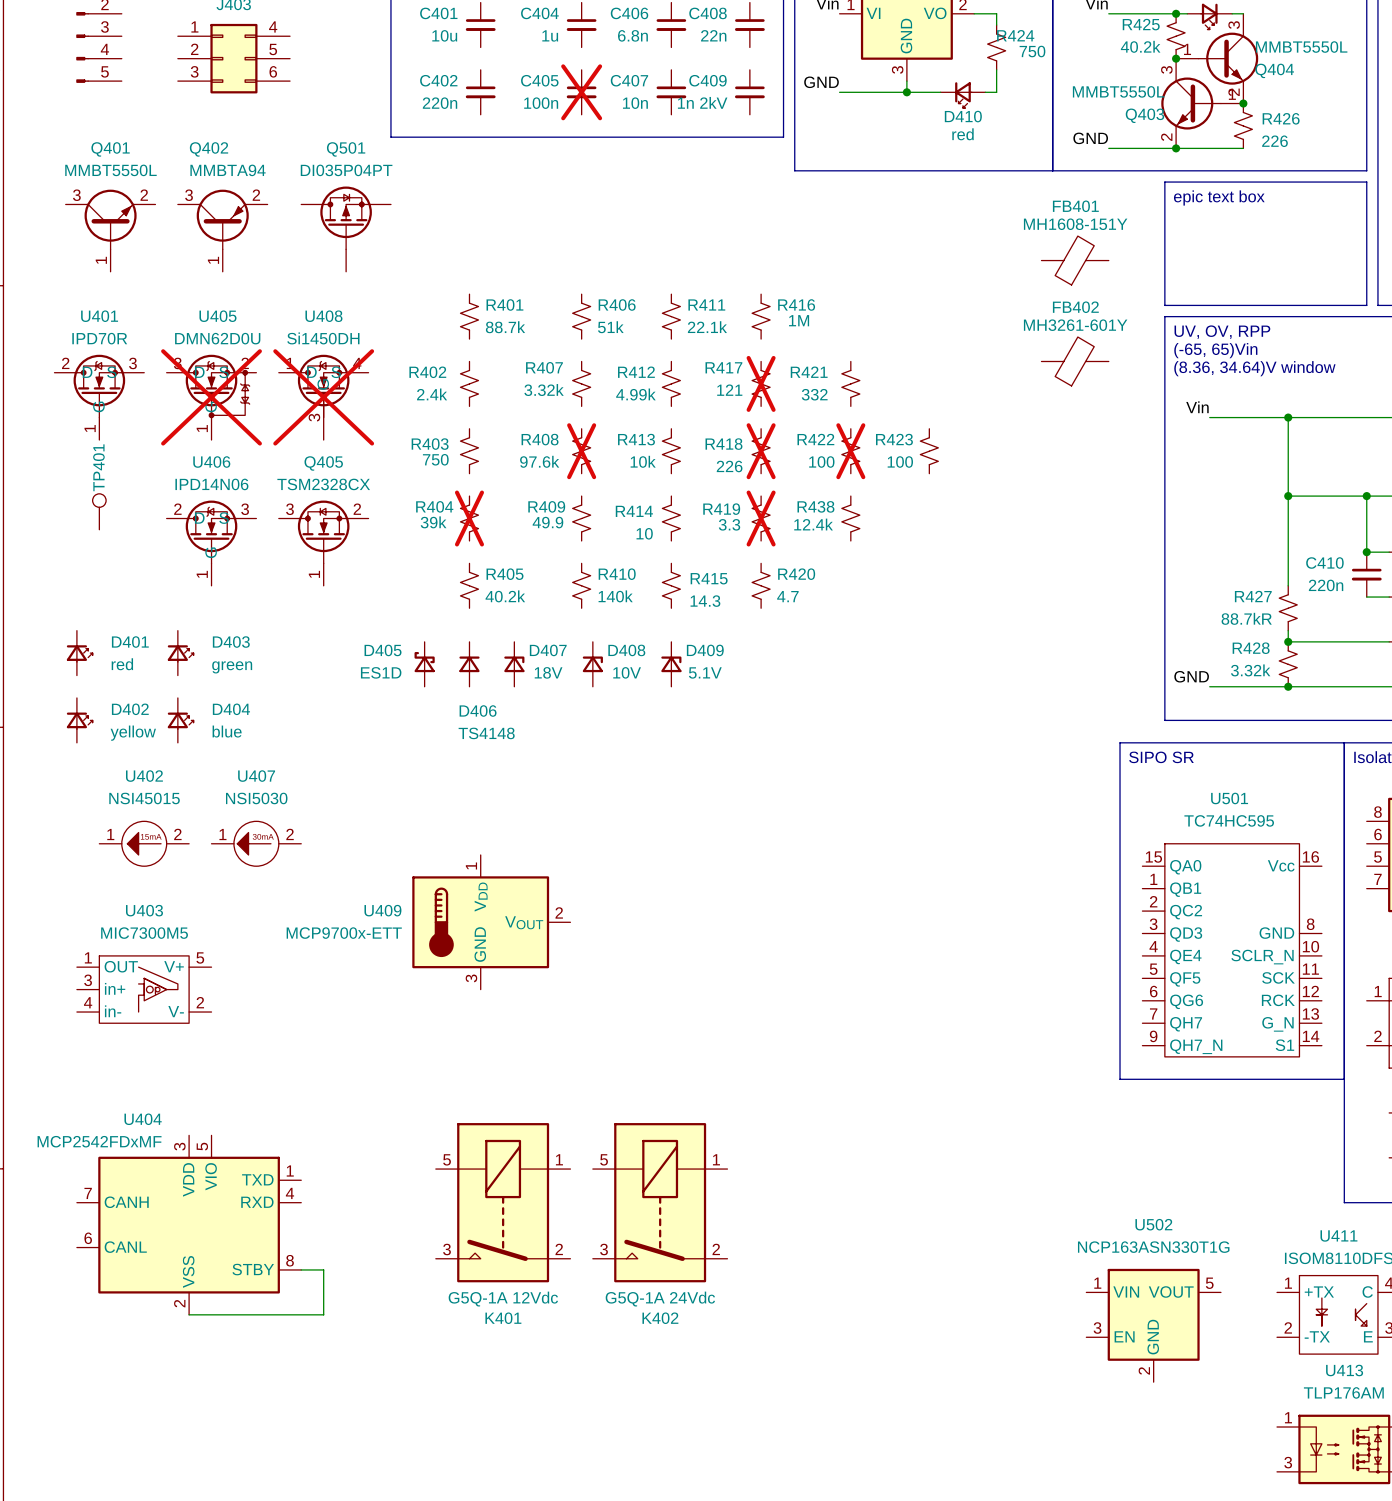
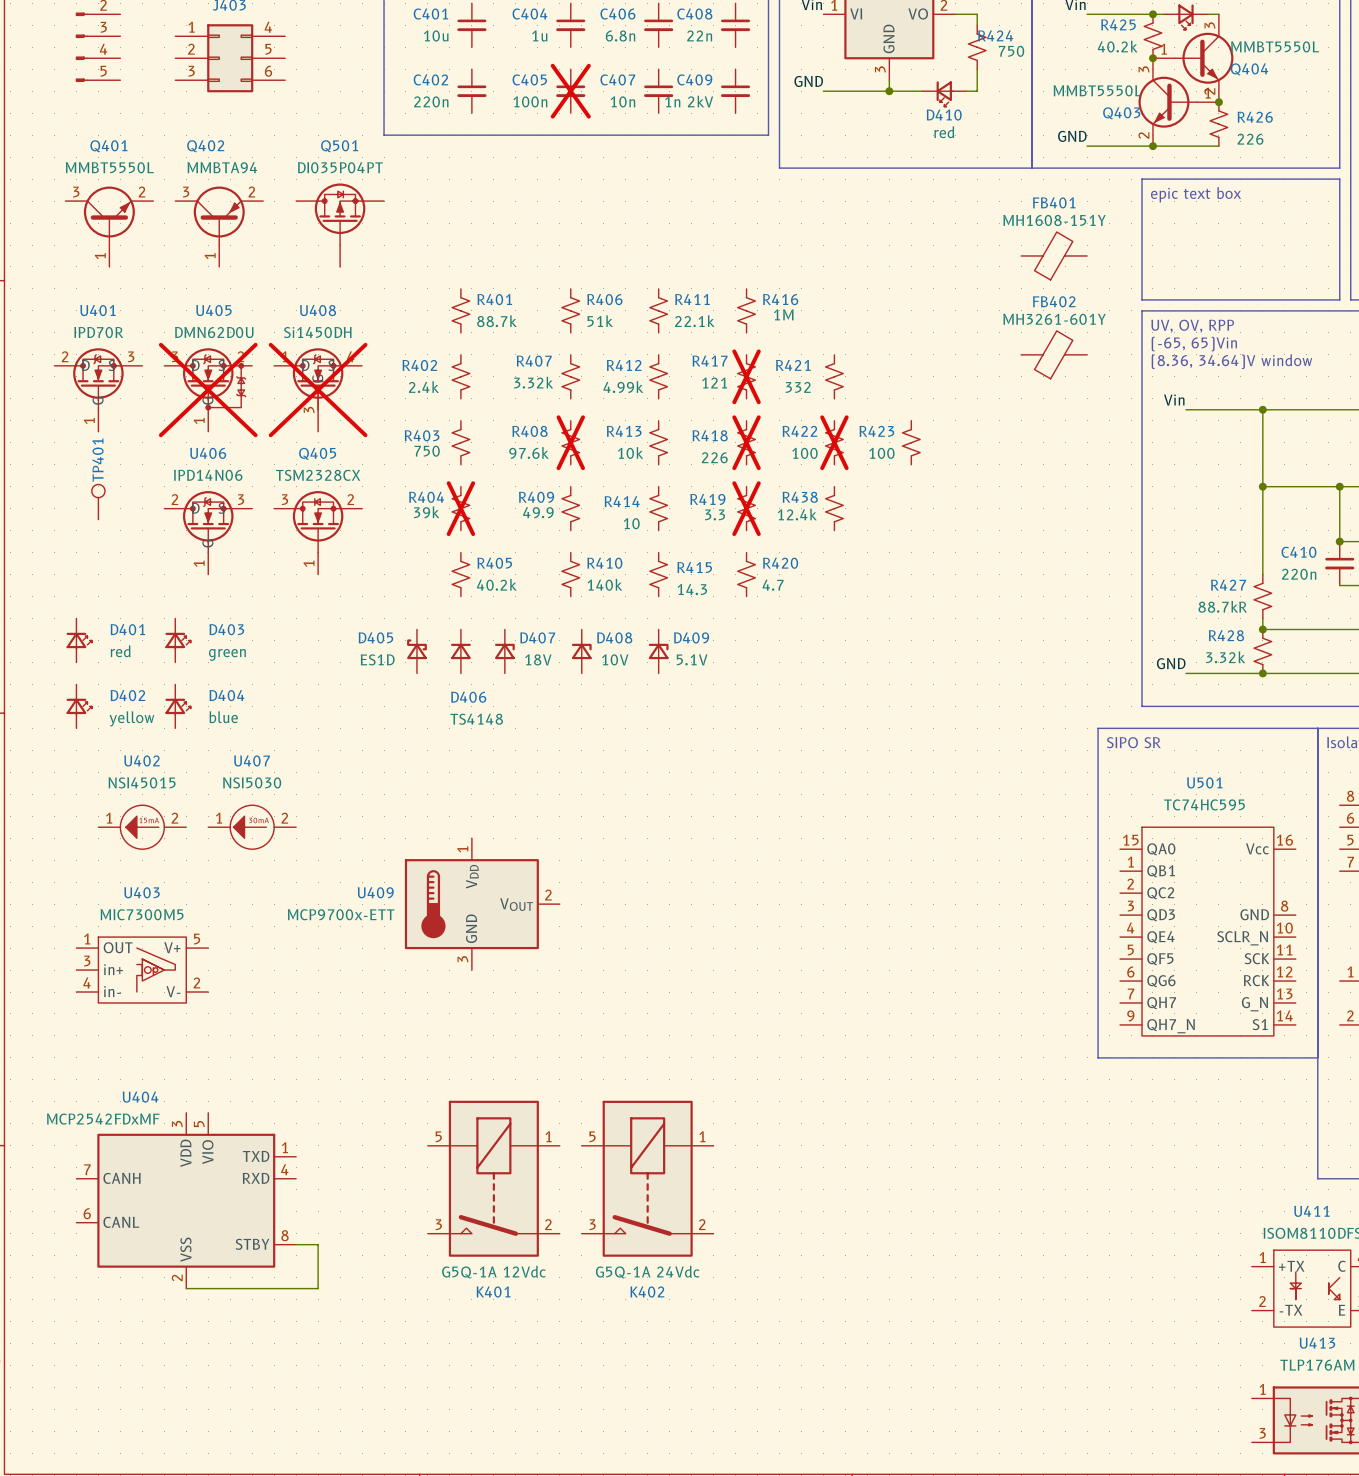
U502: NCP163ASN330T1G (1153, 1325) -> none

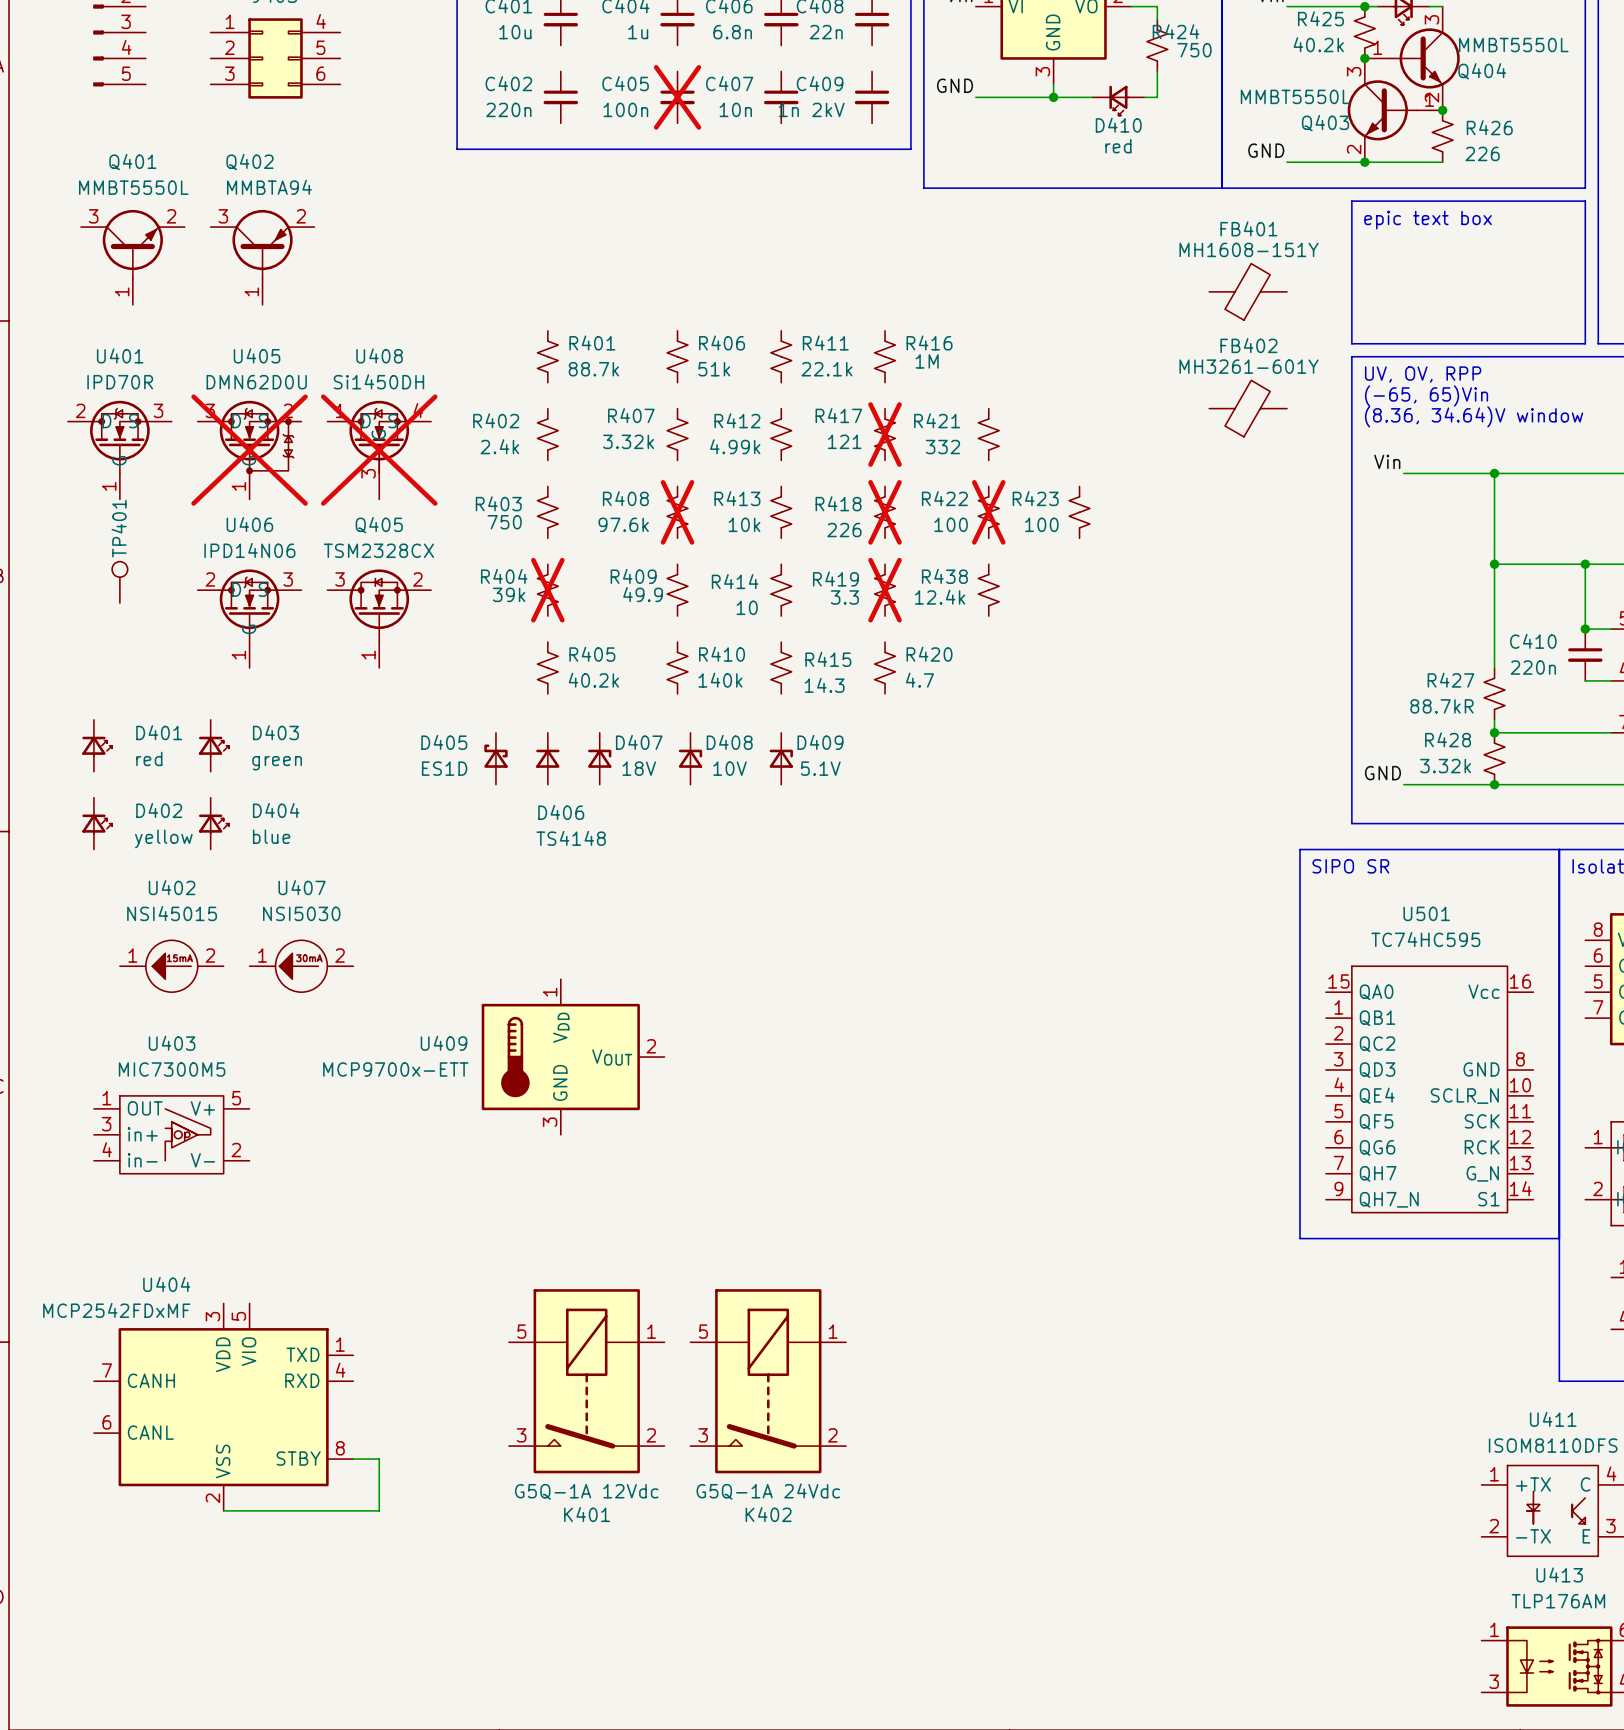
Q501: DI035P04PT (340, 225) -> none

